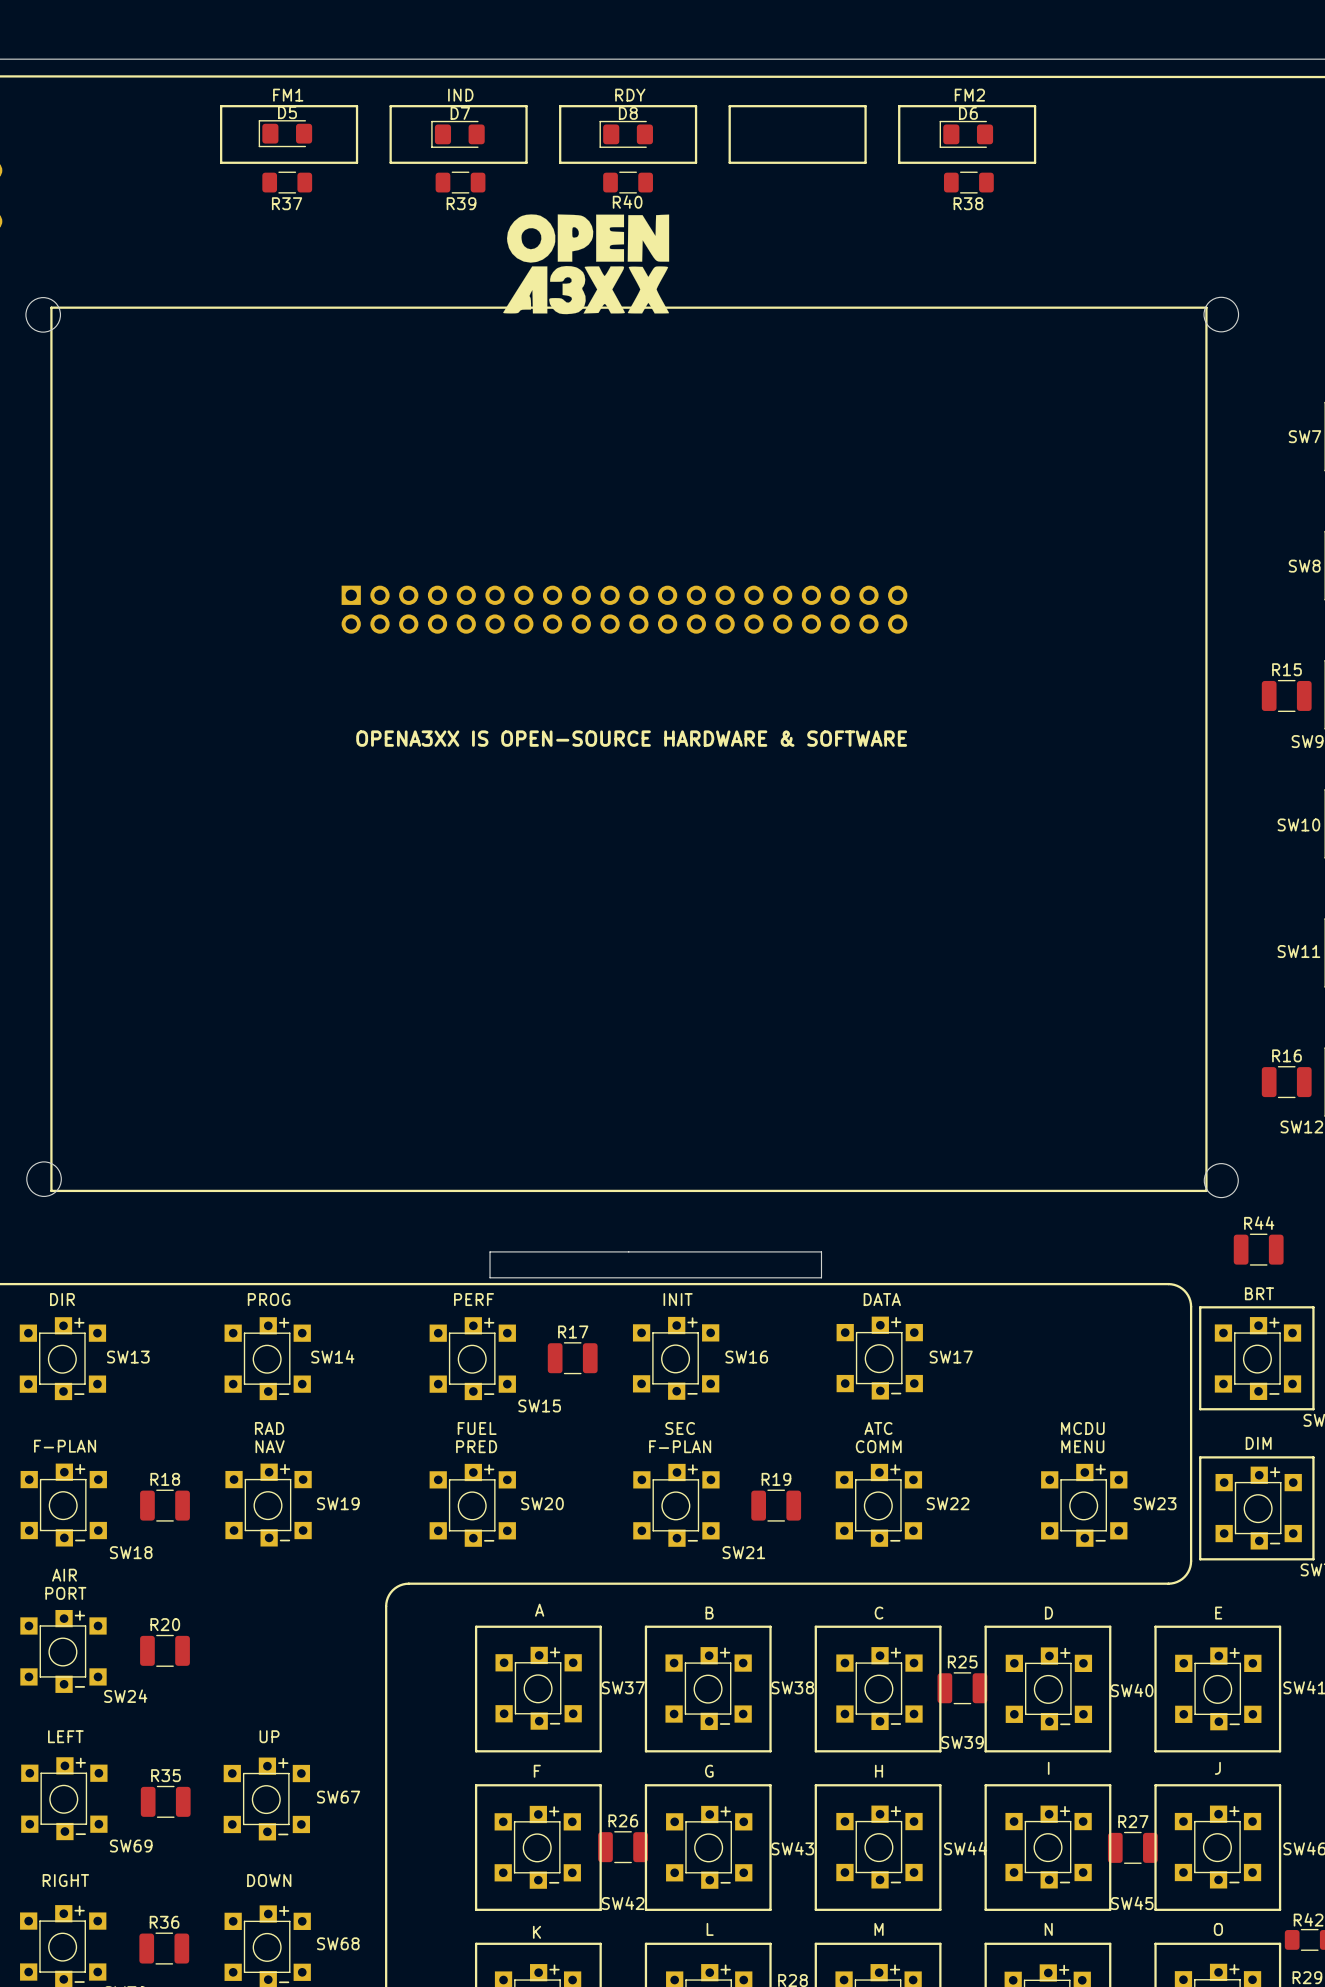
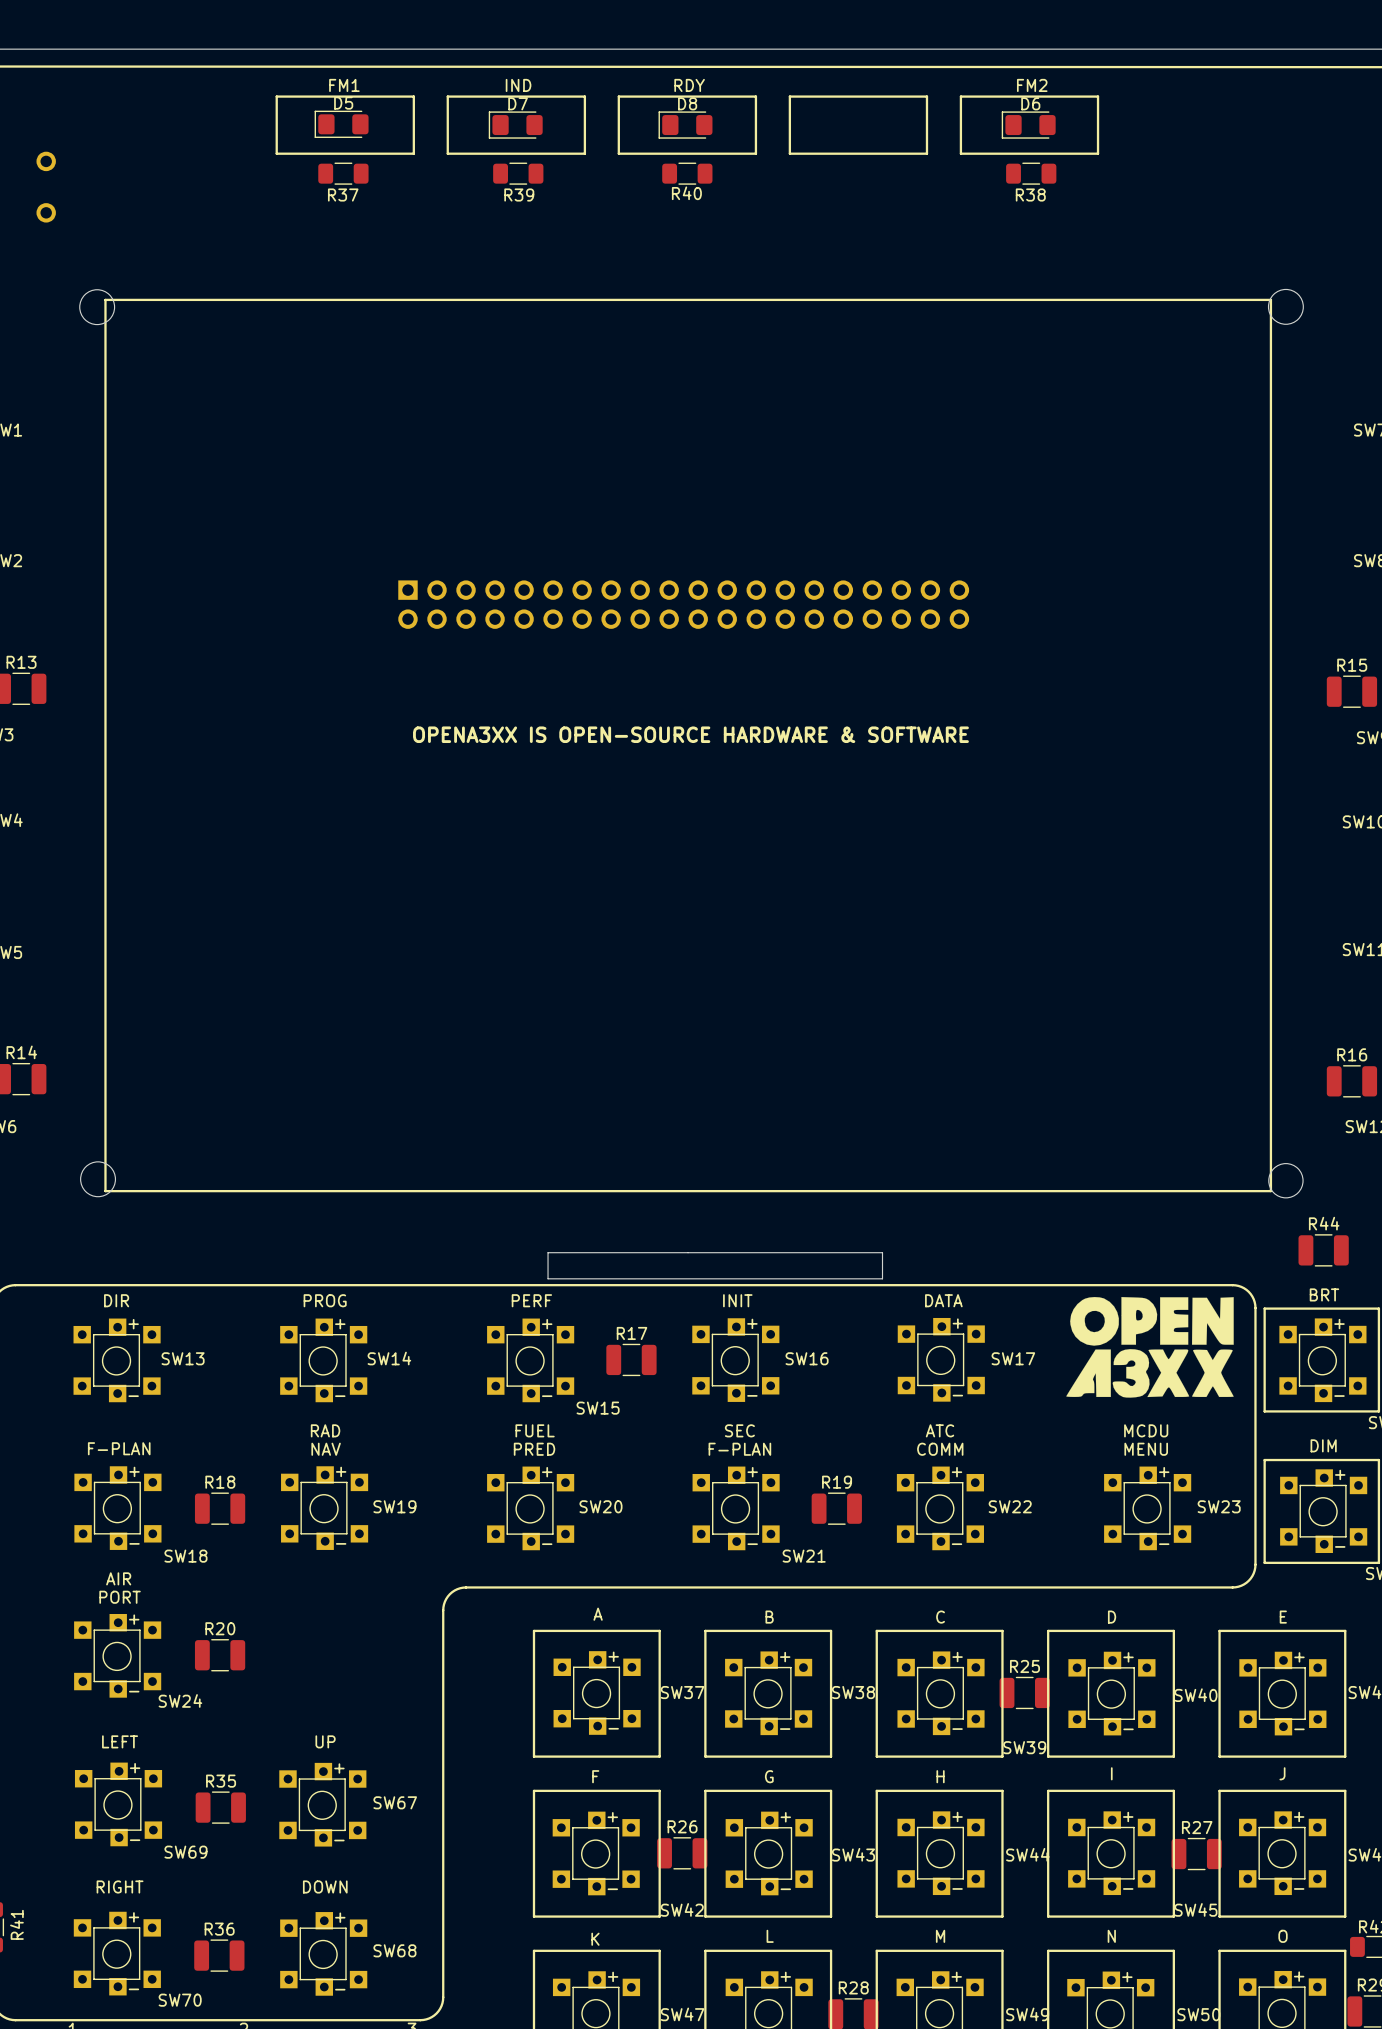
drawing: [503, 214, 670, 315] -> none
drawing: none -> [1066, 1297, 1234, 1398]

